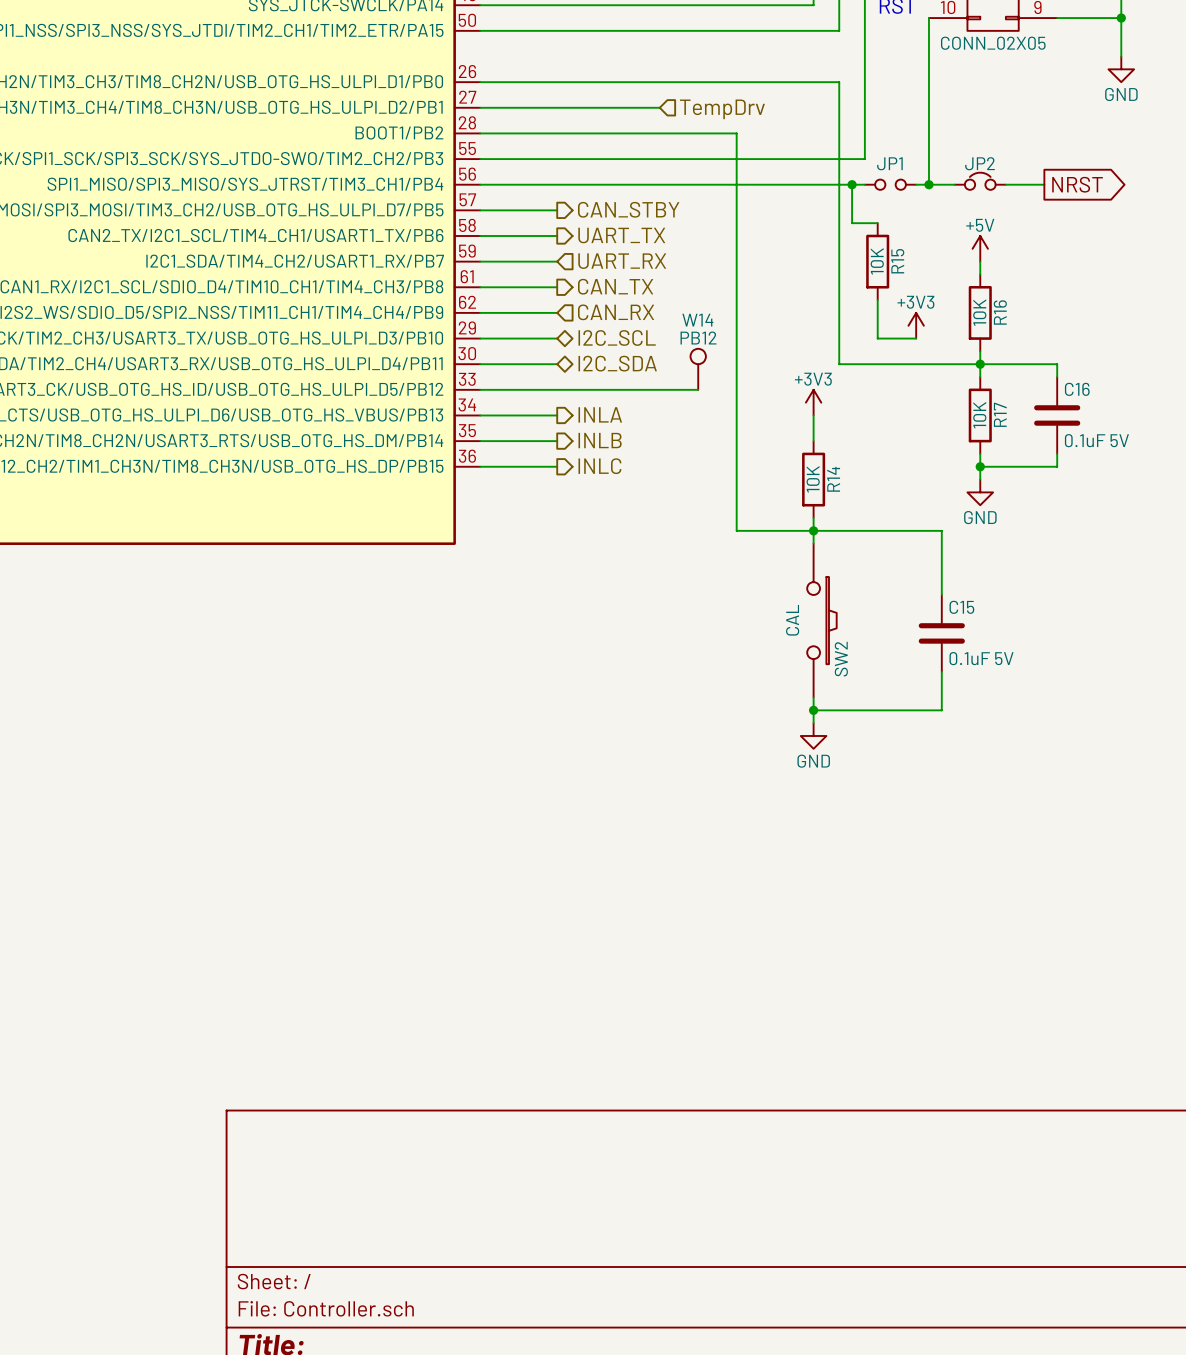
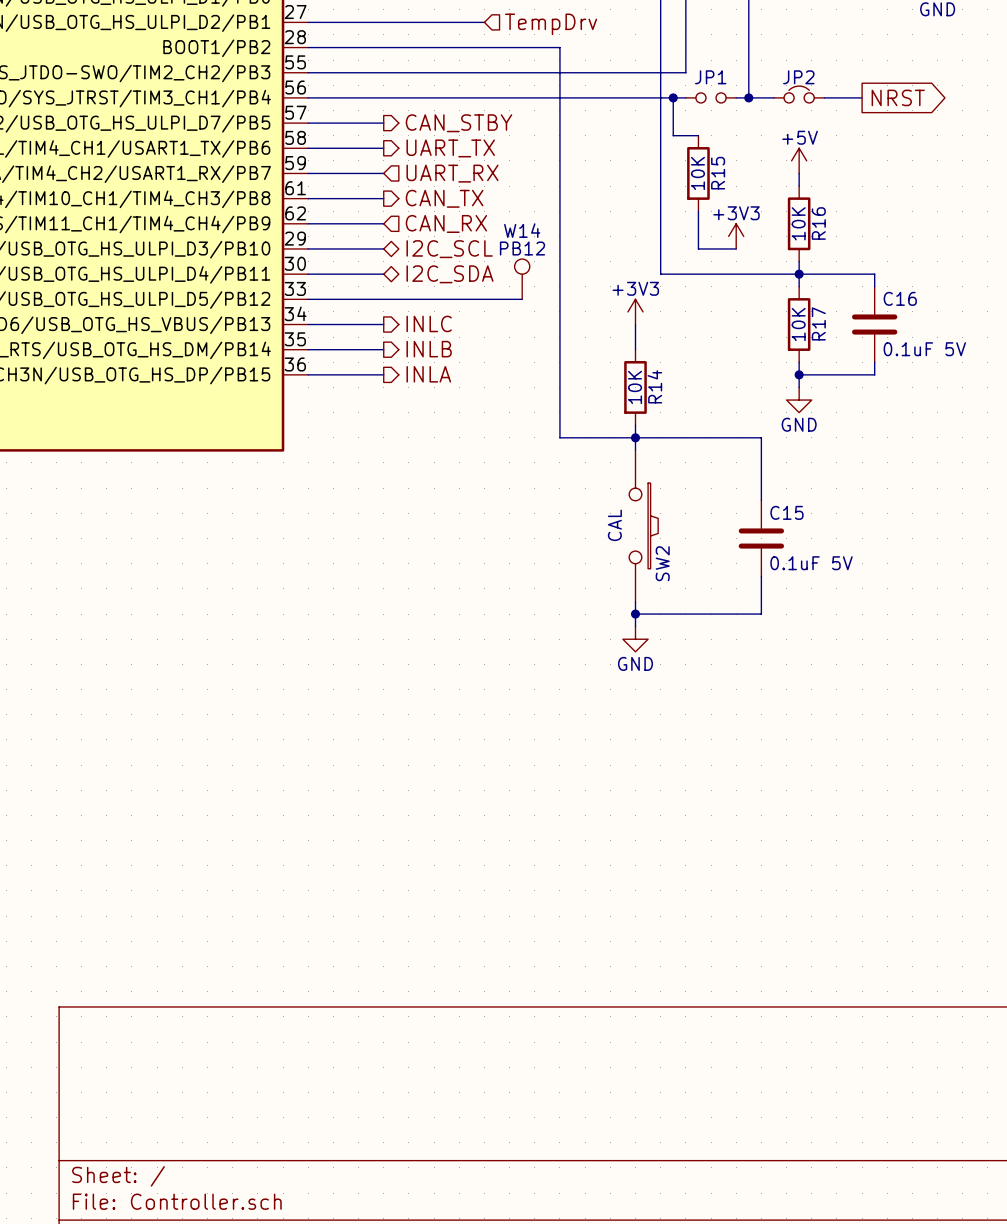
hierarchical label: INLA (600, 414) -> INLC (429, 323)
hierarchical label: INLC (599, 466) -> INLA (428, 374)

